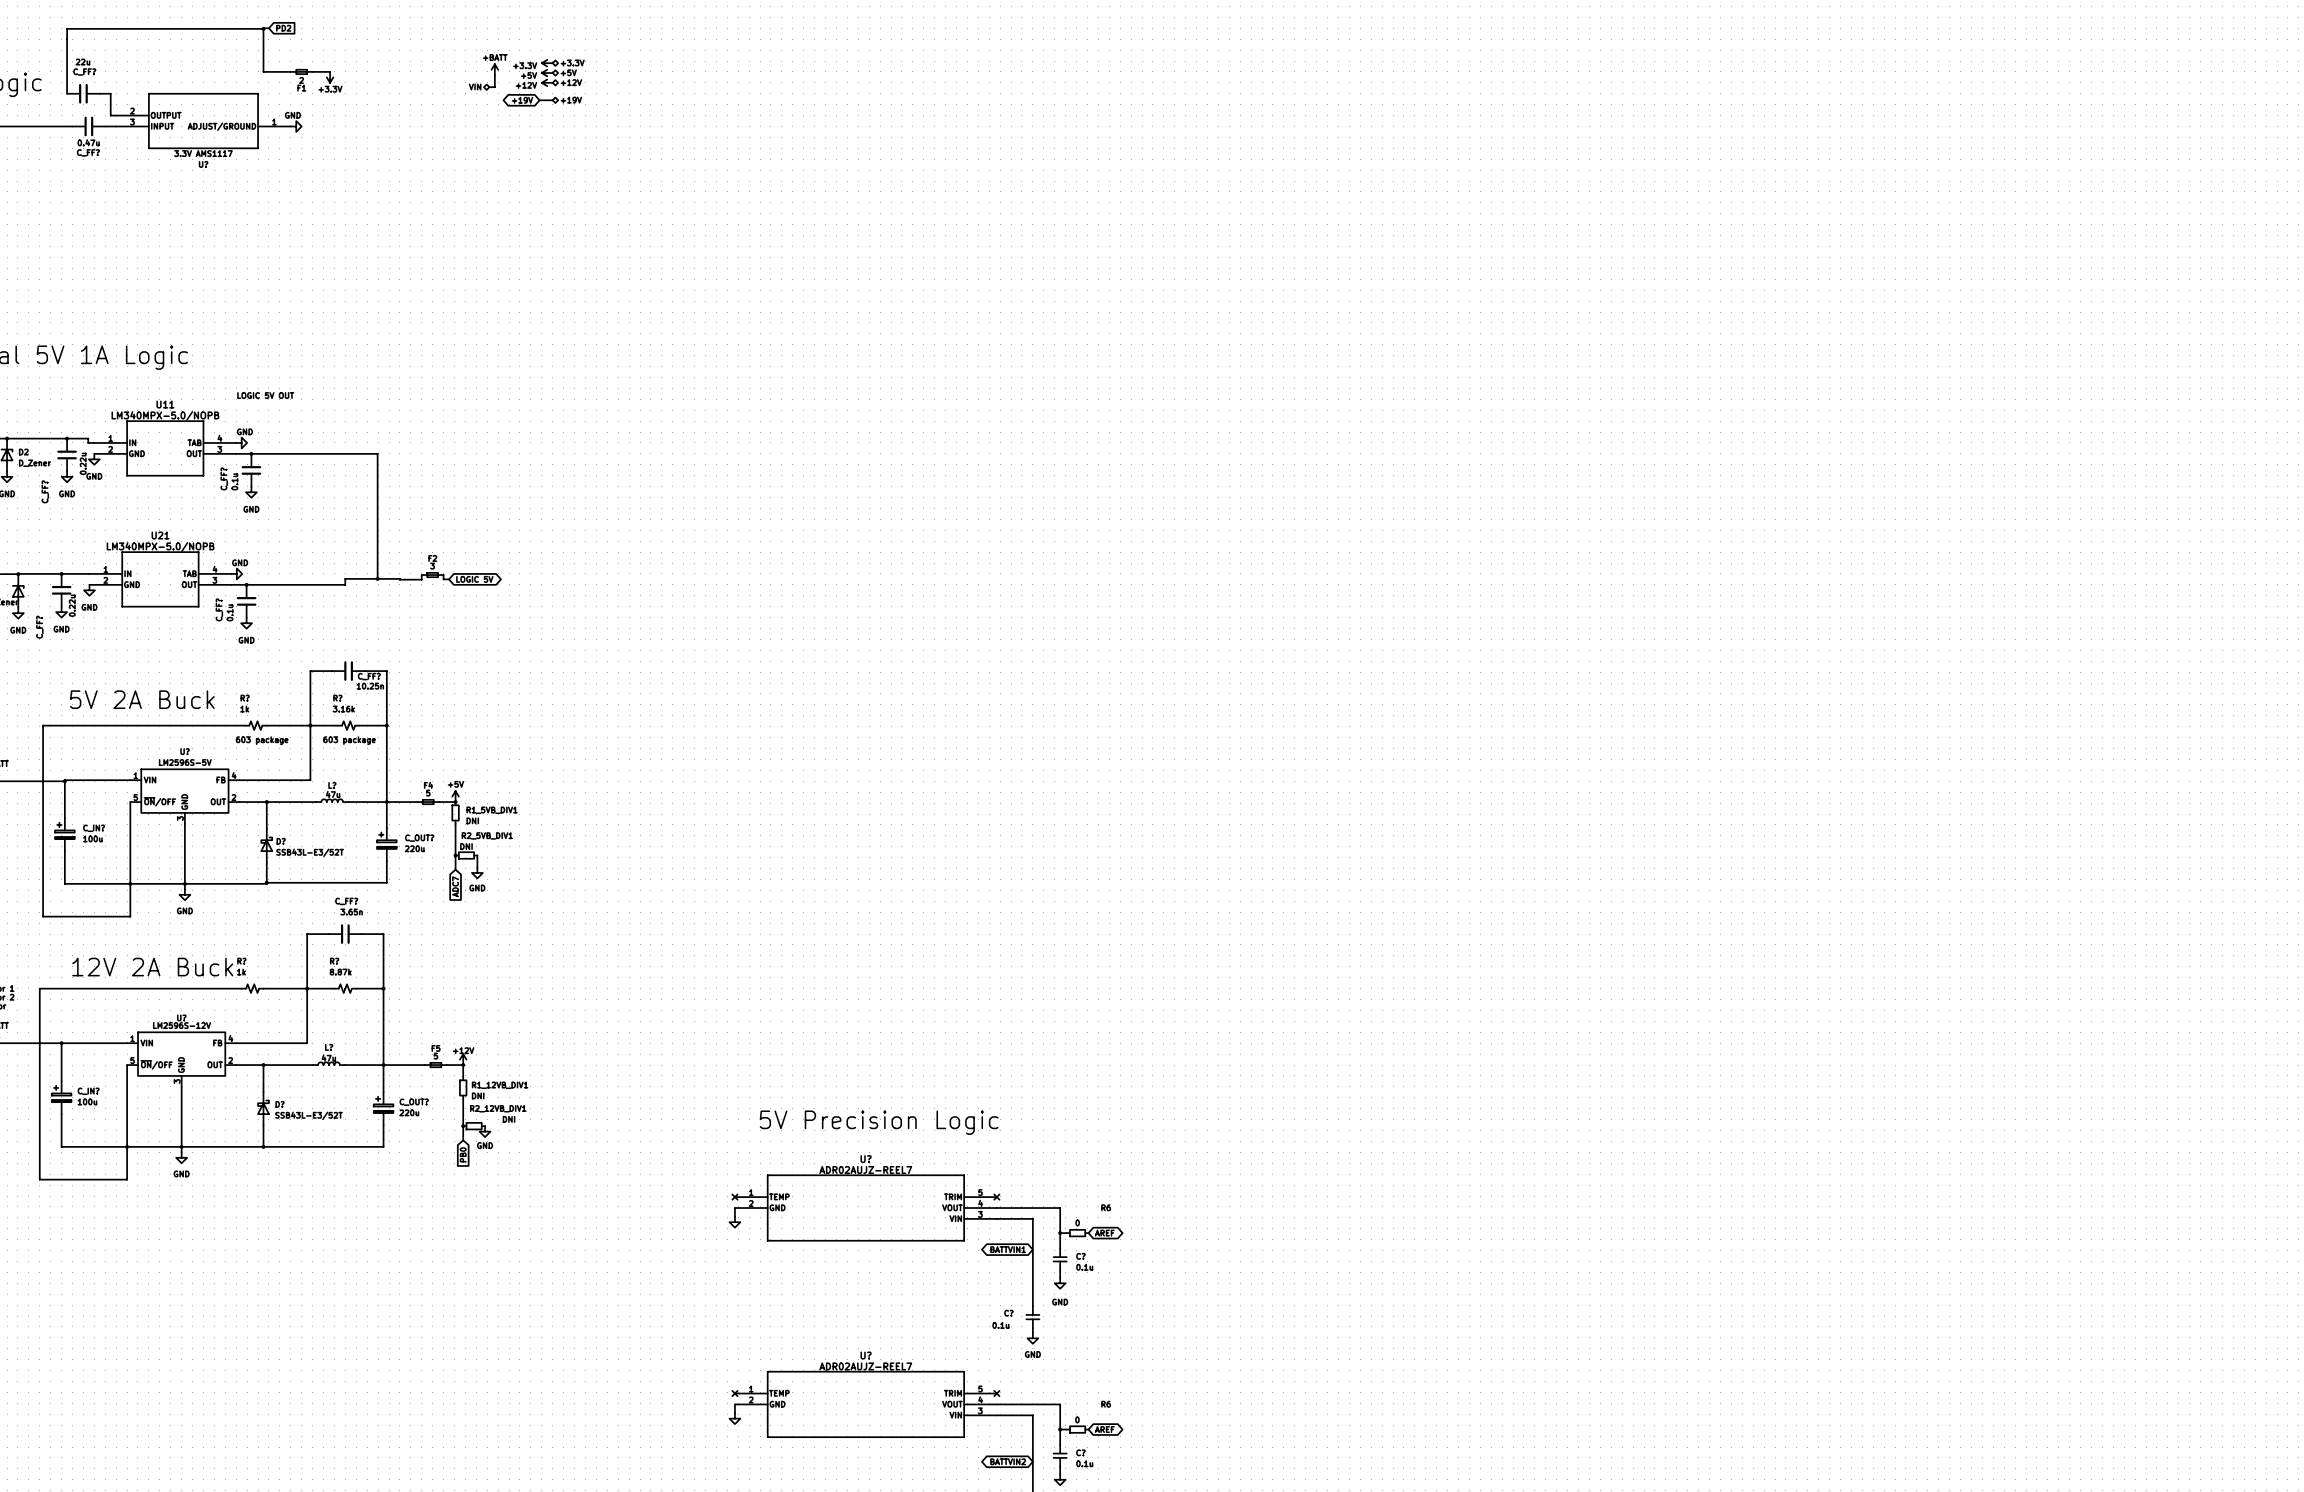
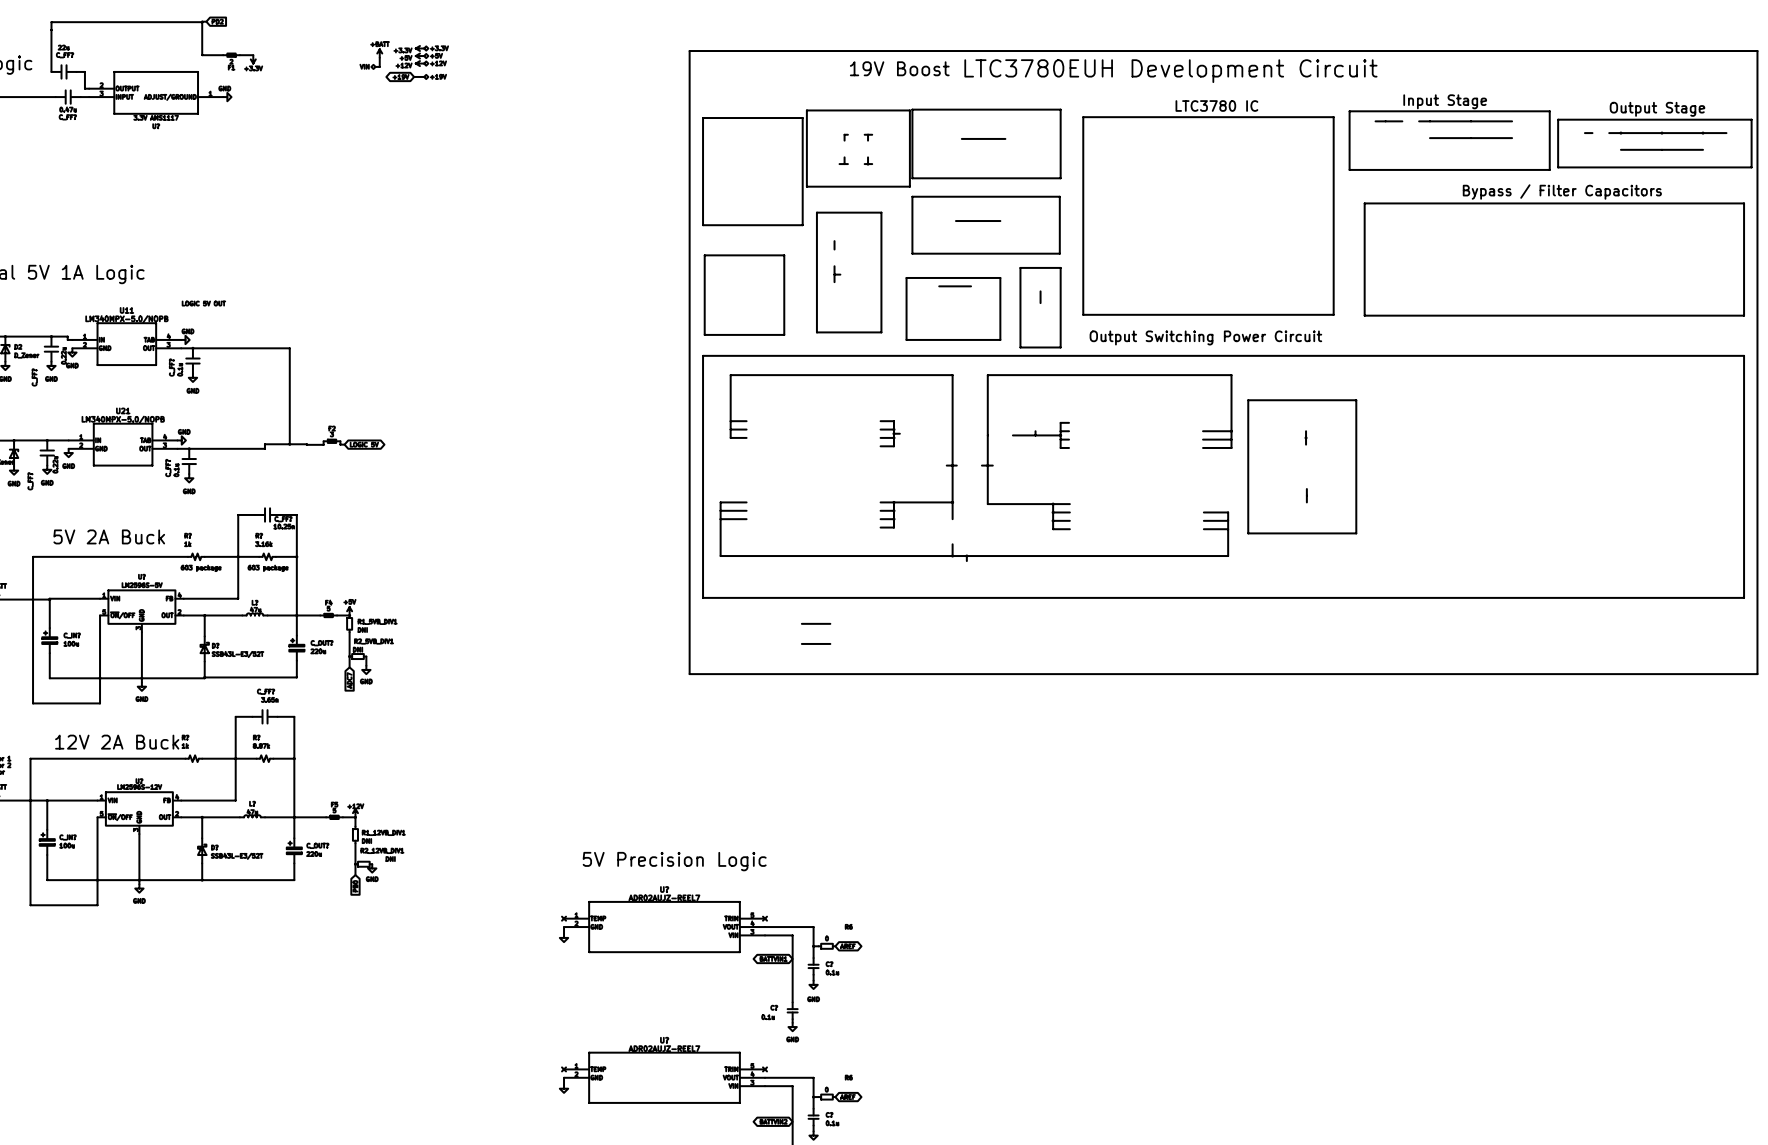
line: none -> (689, 51) (1757, 51) (1757, 674) (689, 674) (689, 51)
text: none -> 19V Boost (899, 68)
text: none -> LTC3780EUH Development Circuit (1170, 71)
text: none -> Input Stage (1445, 101)
text: none -> LTC3780 IC (1216, 106)
line: none -> (912, 109) (912, 178) (1060, 178) (1060, 109) (912, 109)
text: none -> Output Stage (1657, 109)
line: none -> (806, 110) (909, 110) (909, 186) (806, 186) (806, 110)
line: none -> (1349, 111) (1549, 111) (1549, 169) (1349, 169) (1349, 111)
line: none -> (1083, 117) (1333, 117) (1333, 314) (1083, 314) (1083, 117)
line: none -> (703, 118) (703, 225) (802, 225) (802, 118) (703, 118)
line: none -> (1558, 119) (1751, 119) (1751, 167) (1558, 167) (1558, 119)
wire: none -> (1375, 121) (1402, 121)
wire: none -> (1419, 121) (1512, 121)
wire: none -> (1584, 133) (1592, 133)
wire: none -> (1609, 133) (1726, 133)
wire: none -> (847, 134) (844, 134) (844, 140)
wire: none -> (864, 134) (872, 134)
wire: none -> (868, 134) (868, 140)
wire: none -> (1430, 138) (1512, 138)
wire: none -> (961, 138) (1005, 138)
wire: none -> (1620, 149) (1703, 149)
wire: none -> (844, 157) (844, 164)
wire: none -> (868, 157) (868, 164)
wire: none -> (839, 164) (847, 164)
wire: none -> (864, 164) (872, 164)
text: none -> Bypass / Filter Capacitors (1562, 192)
line: none -> (912, 196) (1059, 196) (1059, 253) (912, 253) (912, 196)
line: none -> (1364, 203) (1744, 203) (1744, 315) (1364, 315) (1364, 203)
line: none -> (816, 212) (881, 212) (881, 332) (816, 332) (816, 212)
wire: none -> (955, 221) (1000, 221)
wire: none -> (834, 241) (834, 249)
line: none -> (704, 255) (784, 255) (784, 334) (704, 334) (704, 255)
wire: none -> (834, 266) (834, 282)
line: none -> (1020, 267) (1060, 267) (1060, 347) (1020, 347) (1020, 267)
wire: none -> (834, 274) (840, 274)
line: none -> (906, 277) (1000, 277) (1000, 339) (906, 339) (906, 277)
wire: none -> (939, 286) (971, 286)
wire: none -> (1040, 291) (1040, 303)
text: none -> Output Switching Power Circuit (1205, 337)
line: none -> (703, 355) (1744, 355) (1744, 597) (703, 597) (703, 355)
line: none -> (1248, 400) (1356, 400) (1356, 533) (1248, 533) (1248, 400)
wire: none -> (730, 421) (746, 421)
wire: none -> (880, 421) (893, 421) (893, 446) (880, 446)
wire: none -> (1069, 422) (1060, 422) (1060, 447) (1069, 447)
wire: none -> (730, 429) (746, 429)
wire: none -> (880, 429) (893, 429)
wire: none -> (1035, 431) (1035, 435)
wire: none -> (1060, 431) (1069, 431)
wire: none -> (1203, 431) (1231, 431)
wire: none -> (1306, 431) (1306, 444)
wire: none -> (893, 433) (899, 433)
wire: none -> (1012, 435) (1060, 435)
wire: none -> (746, 437) (730, 437) (730, 375) (952, 375) (952, 519)
wire: none -> (880, 437) (893, 437)
wire: none -> (1060, 439) (1069, 439)
wire: none -> (1203, 439) (1231, 439)
wire: none -> (1203, 447) (1231, 447) (1231, 375) (987, 375) (987, 504) (1069, 504)
wire: none -> (946, 465) (956, 465)
wire: none -> (981, 465) (992, 465)
wire: none -> (1306, 489) (1306, 502)
wire: none -> (746, 502) (720, 502) (720, 556) (1228, 556) (1228, 512) (1203, 512)
wire: none -> (880, 502) (952, 502)
wire: none -> (893, 502) (893, 527) (880, 527)
wire: none -> (1053, 504) (1053, 529) (1069, 529)
wire: none -> (720, 510) (746, 510)
wire: none -> (880, 510) (893, 510)
wire: none -> (1053, 512) (1069, 512)
wire: none -> (720, 519) (746, 519)
wire: none -> (880, 519) (893, 519)
wire: none -> (1053, 520) (1069, 520)
wire: none -> (1203, 520) (1228, 520)
wire: none -> (1203, 529) (1228, 529)
wire: none -> (952, 544) (952, 556)
wire: none -> (966, 556) (966, 561)
wire: none -> (801, 623) (830, 623)
wire: none -> (801, 643) (830, 643)

